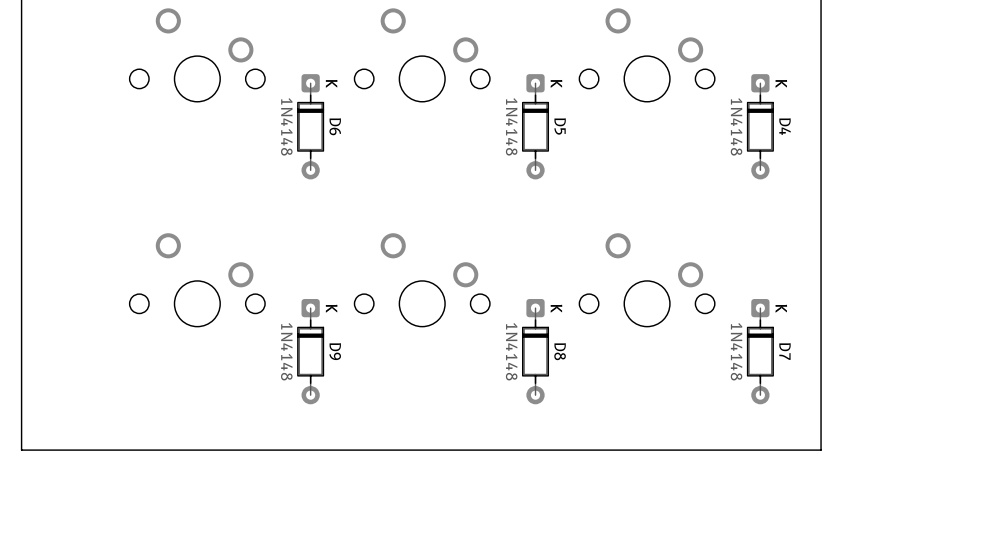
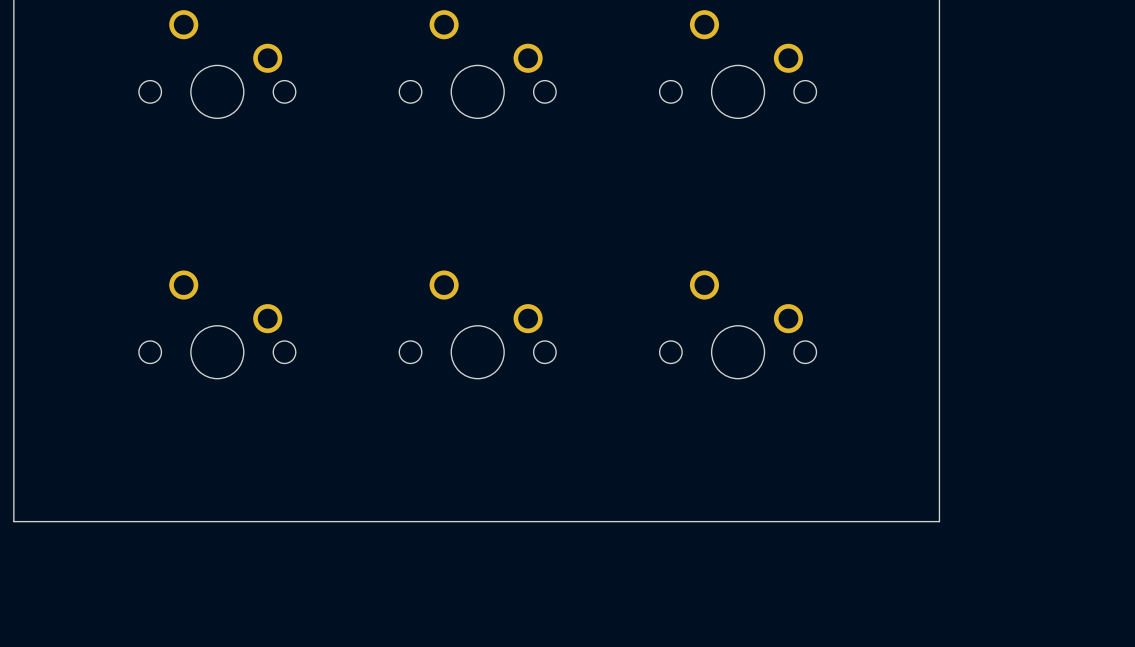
D6: 1N4148 (310, 126) -> none
D5: 1N4148 (535, 126) -> none
D4: 1N4148 (760, 126) -> none
D9: 1N4148 (310, 351) -> none
D8: 1N4148 (535, 351) -> none
D7: 1N4148 (760, 351) -> none

